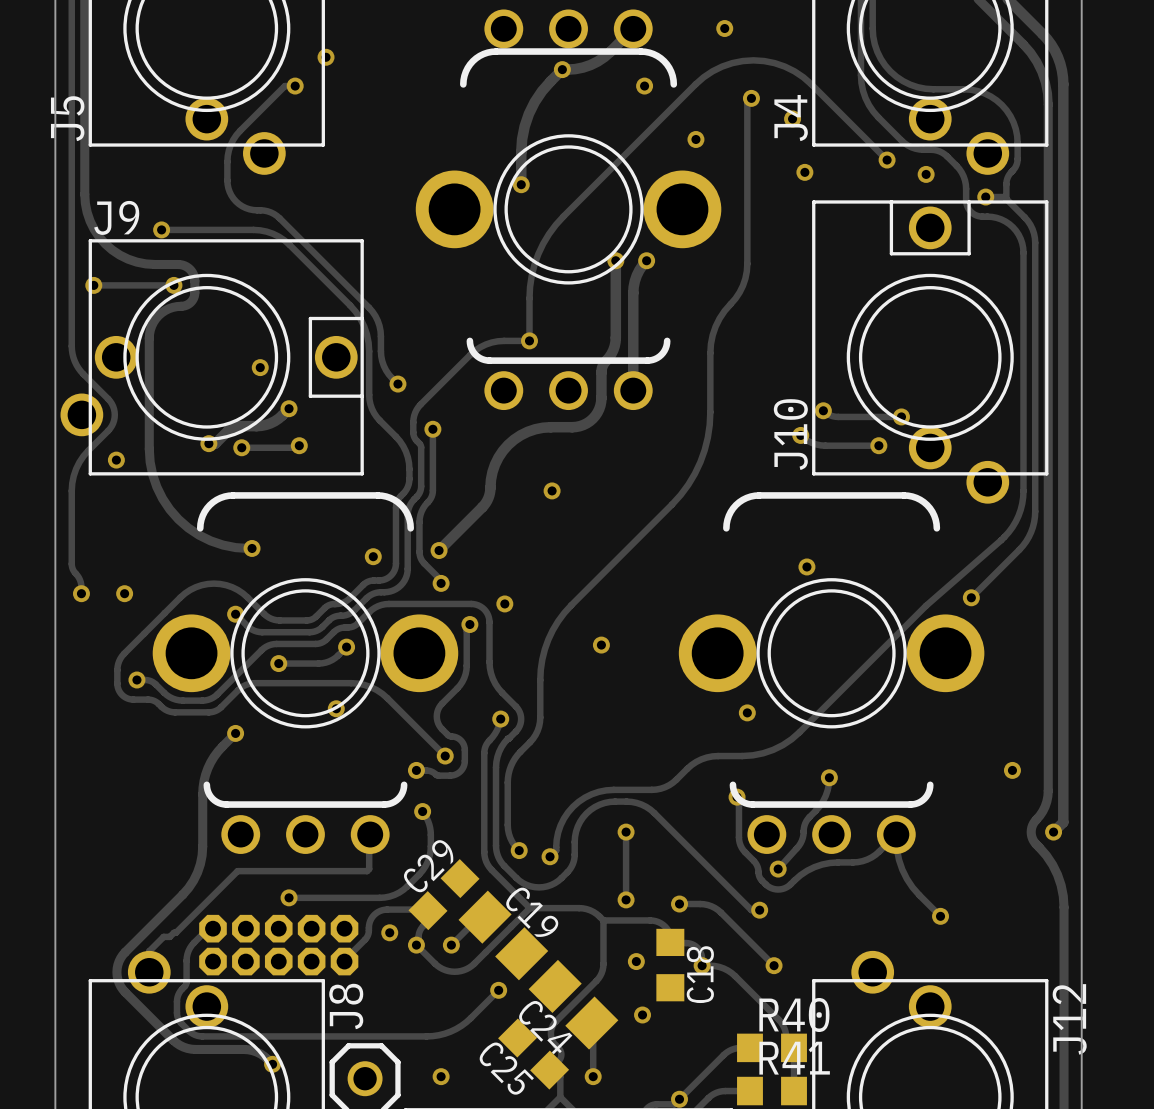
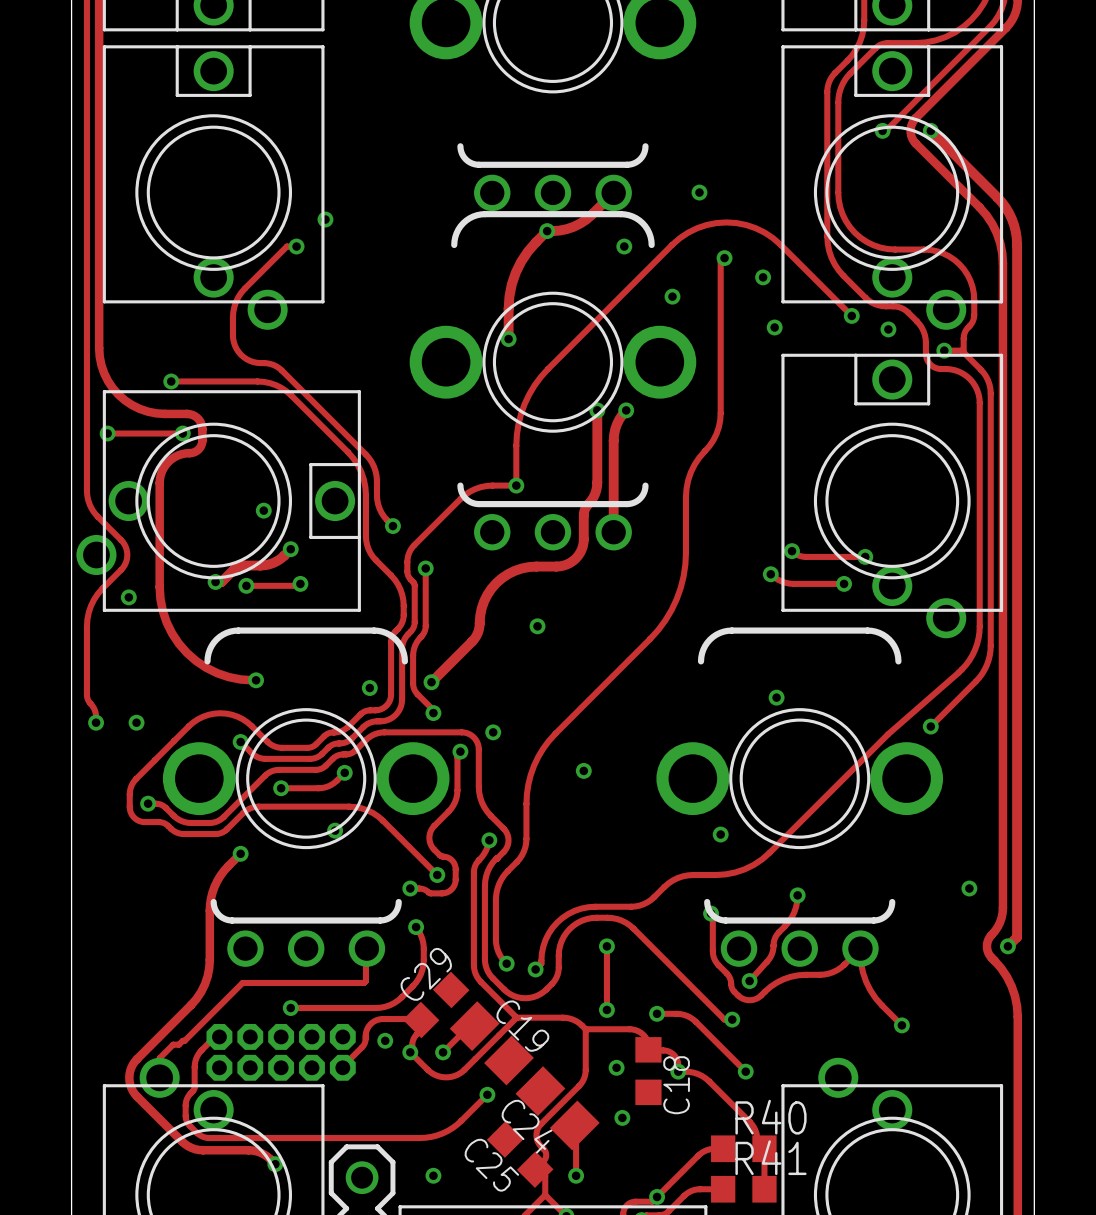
J5 name: J5 (67, 118) -> none
J4 name: J4 (791, 118) -> none
J9 name: J9 (116, 217) -> none
J10 name: J10 (790, 434) -> none
J8 name: J8 (346, 1006) -> none
J12 name: J12 (1069, 1019) -> none

